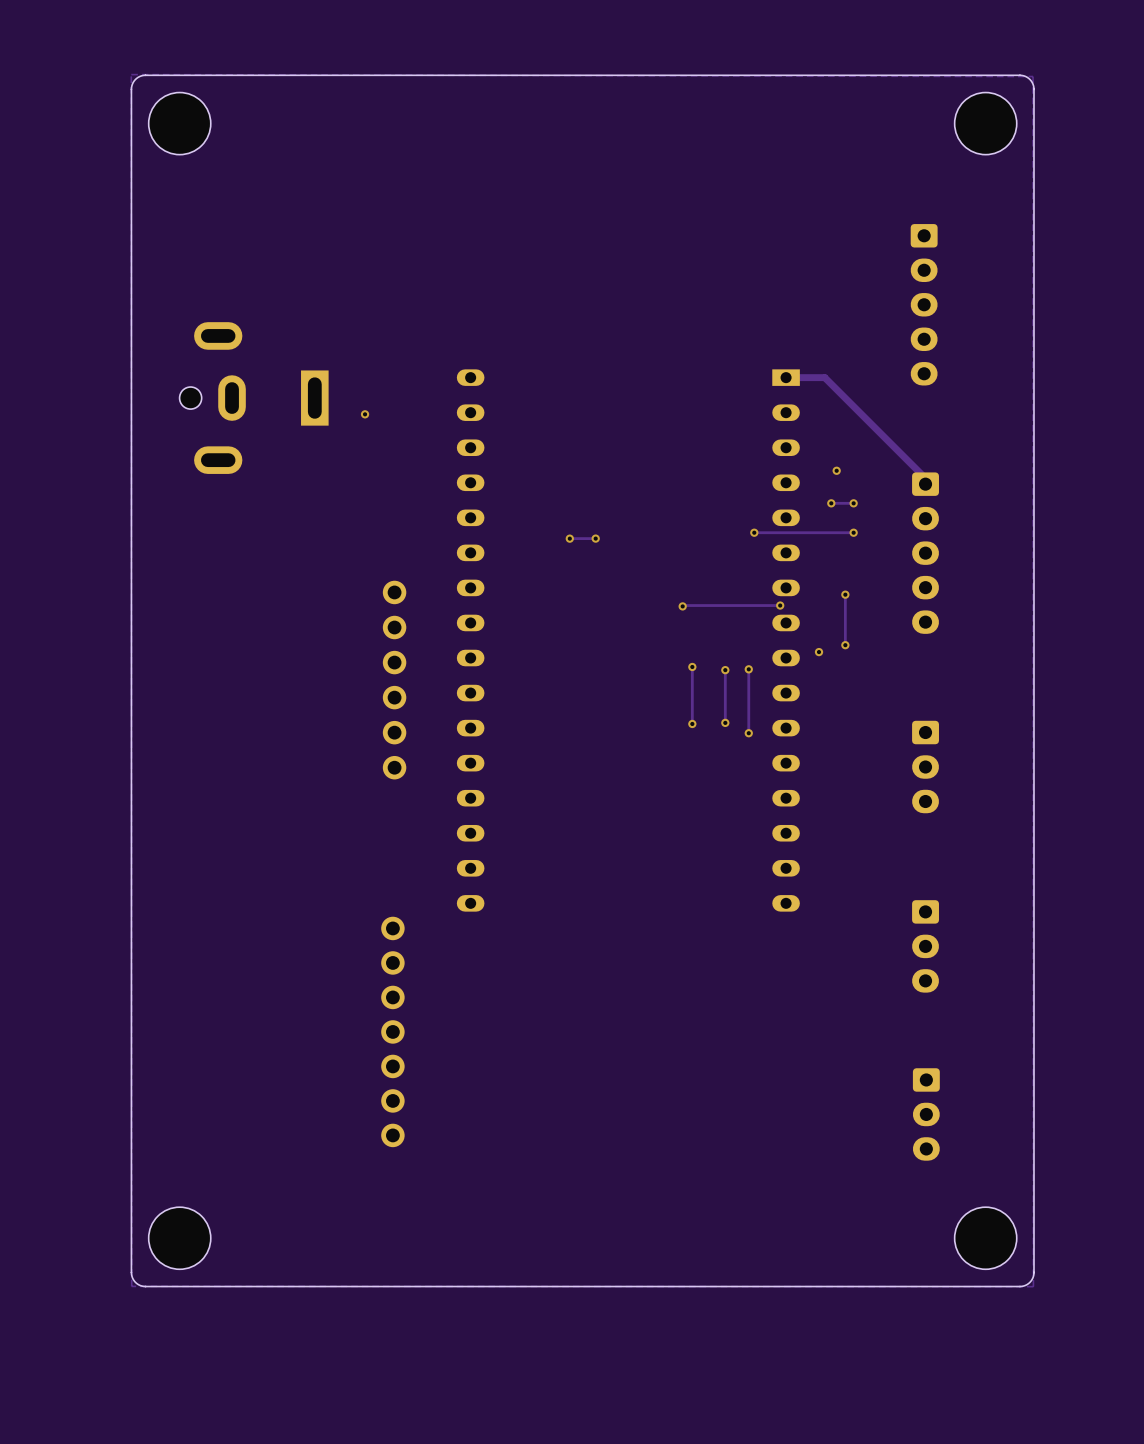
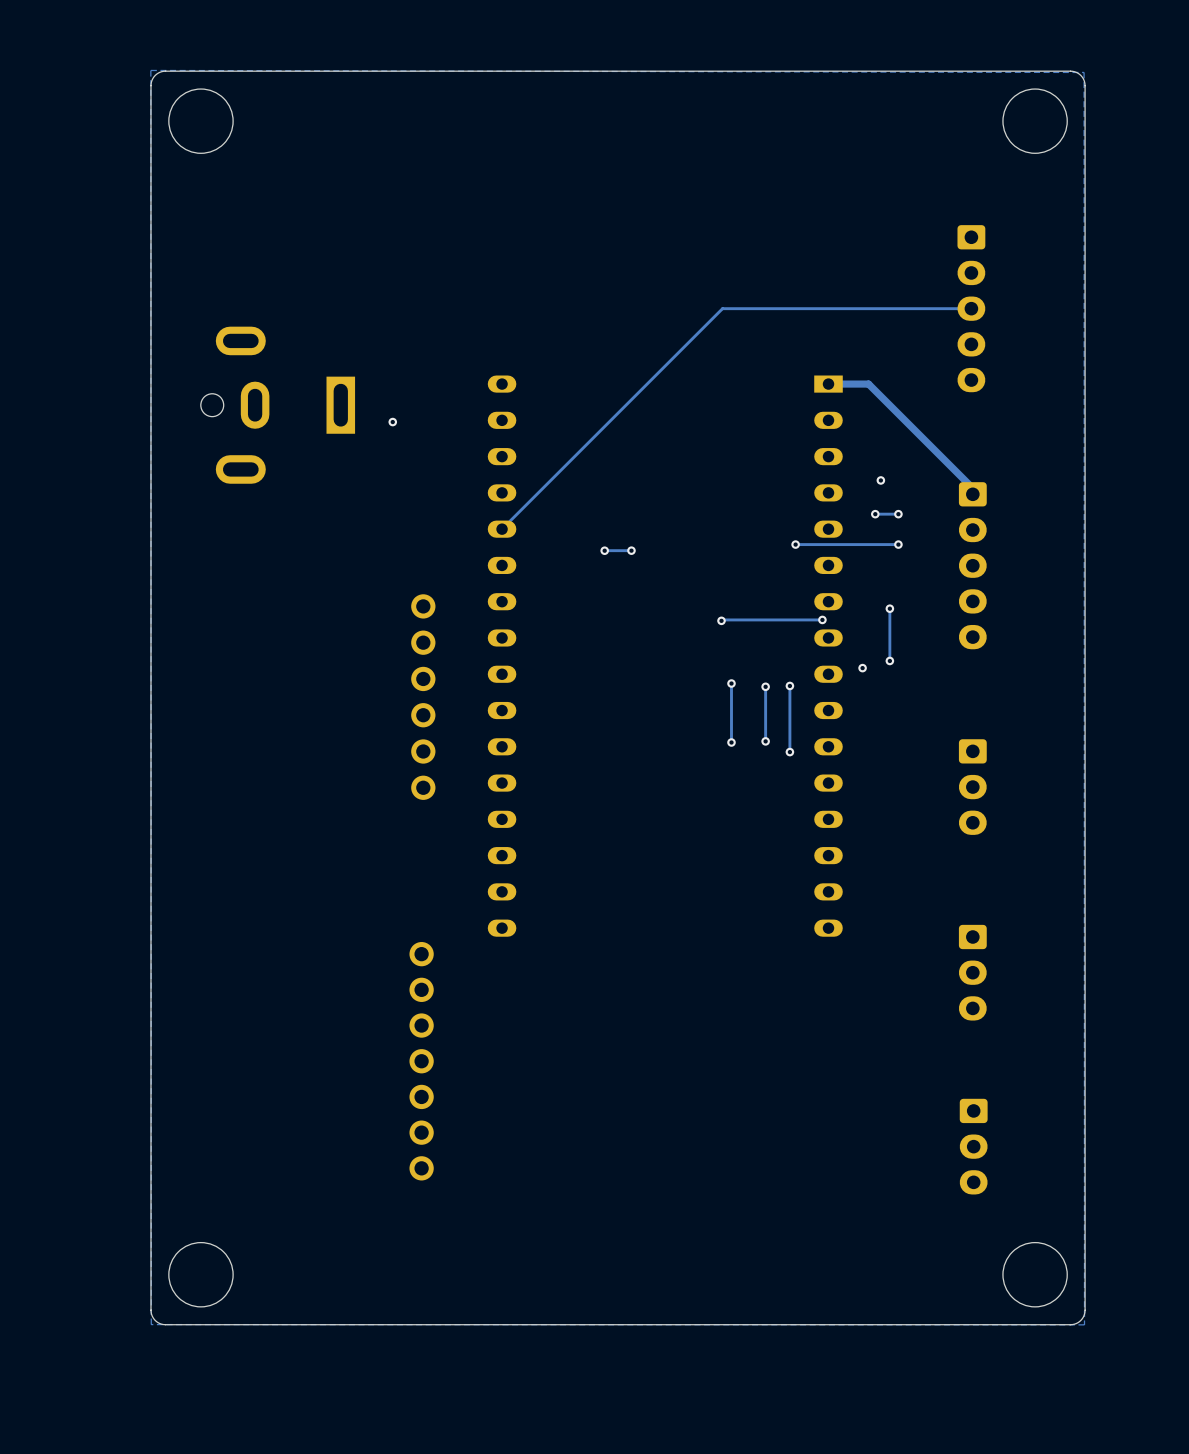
track: none -> (971, 308) (722, 308) (502, 529)

